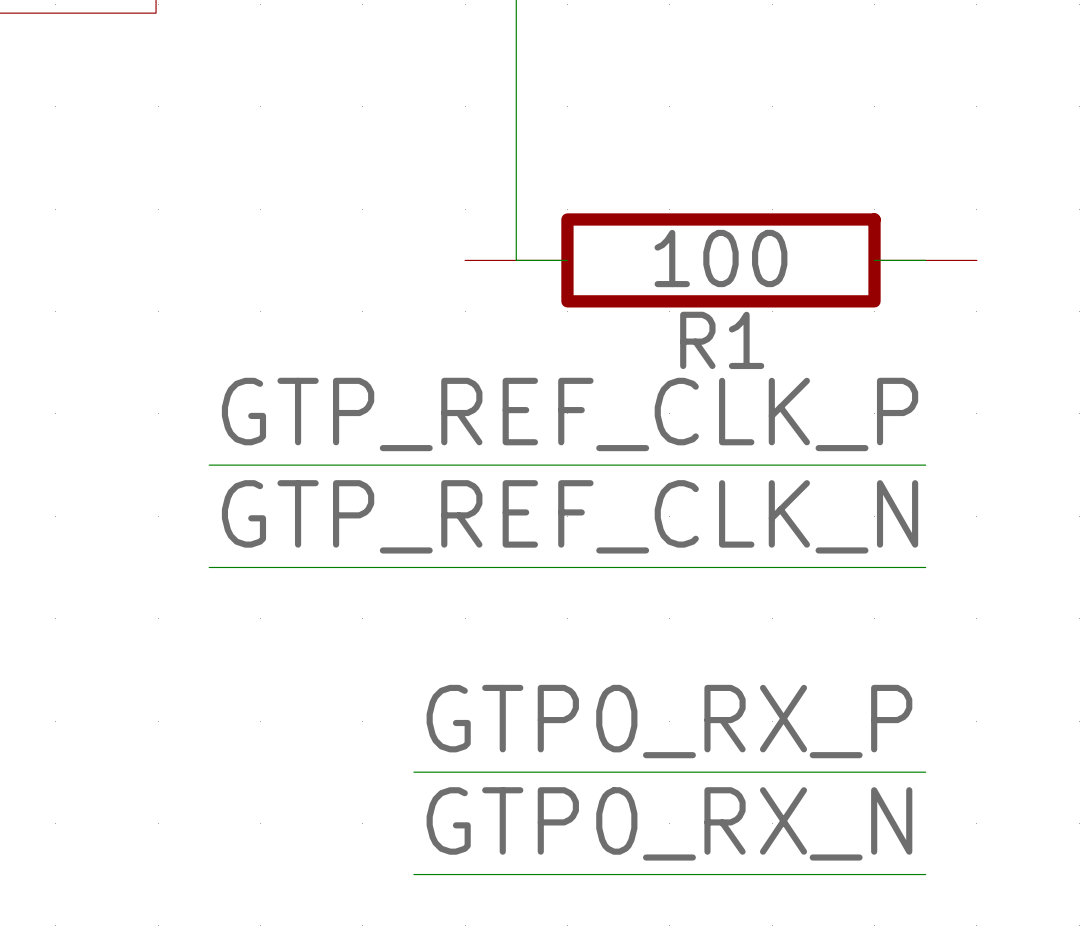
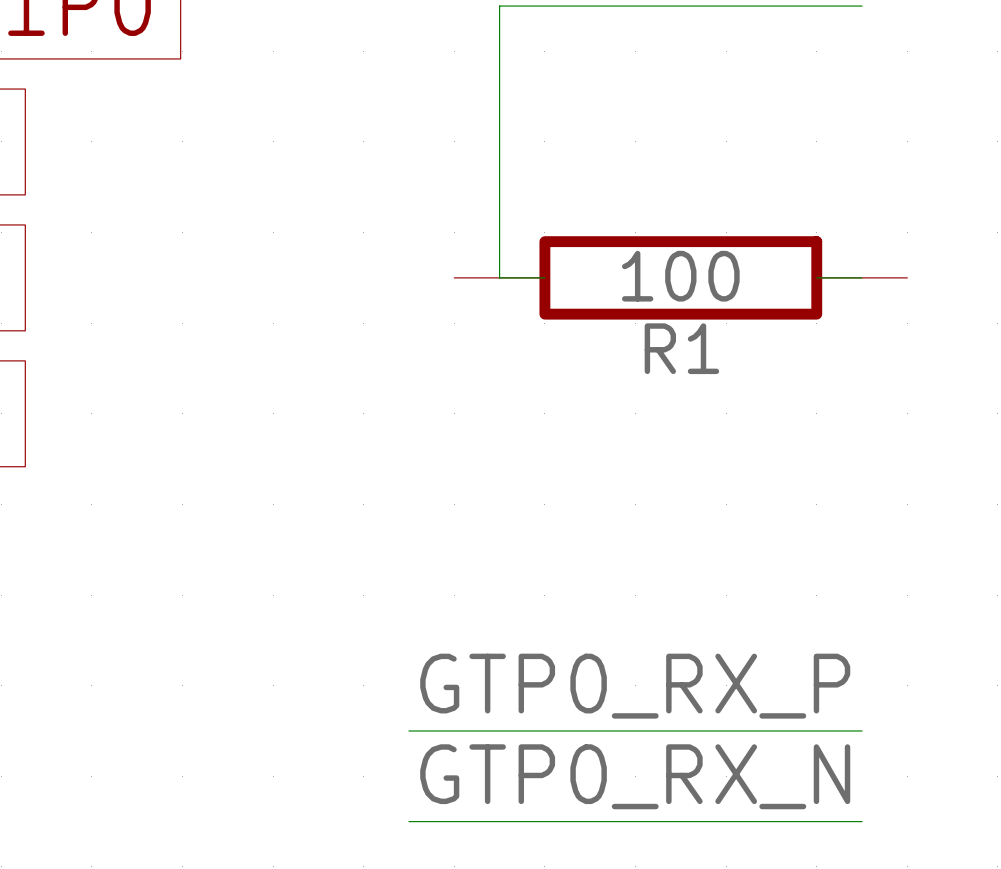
label: GTP_REF_CLK_P (570, 414) -> none
wire: (209, 465) (925, 465) -> none
label: GTP_REF_CLK_N (570, 516) -> none
wire: (209, 567) (925, 567) -> none

